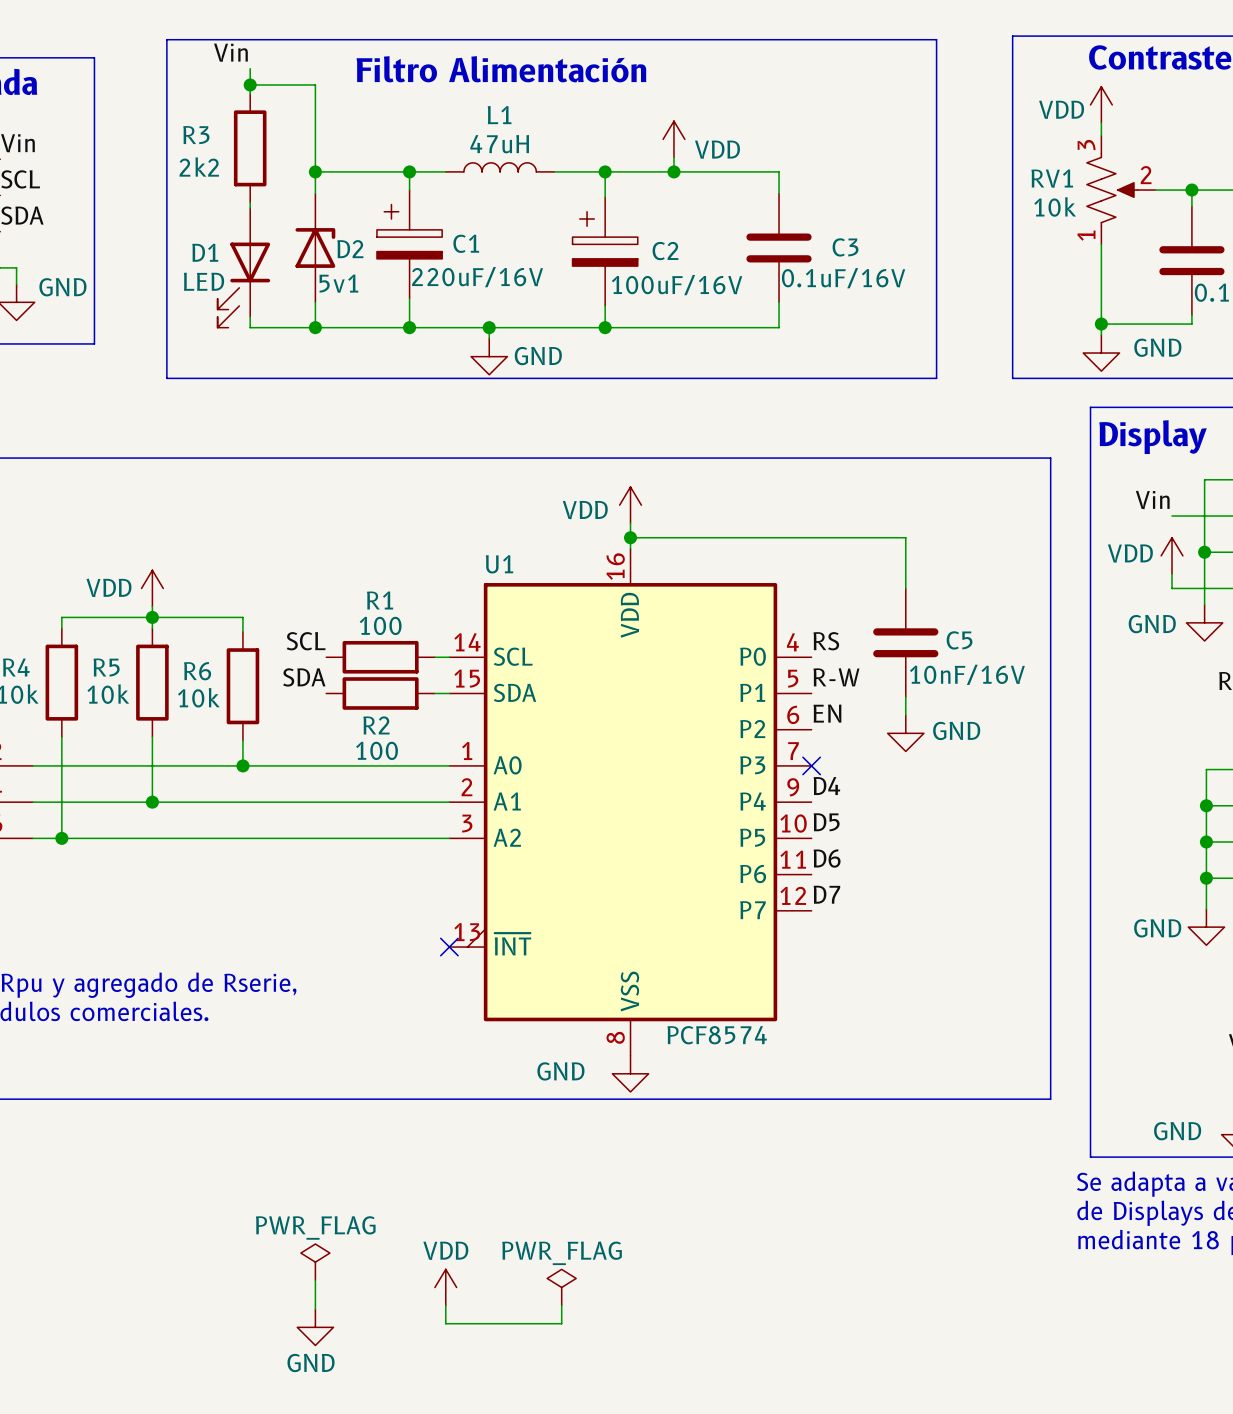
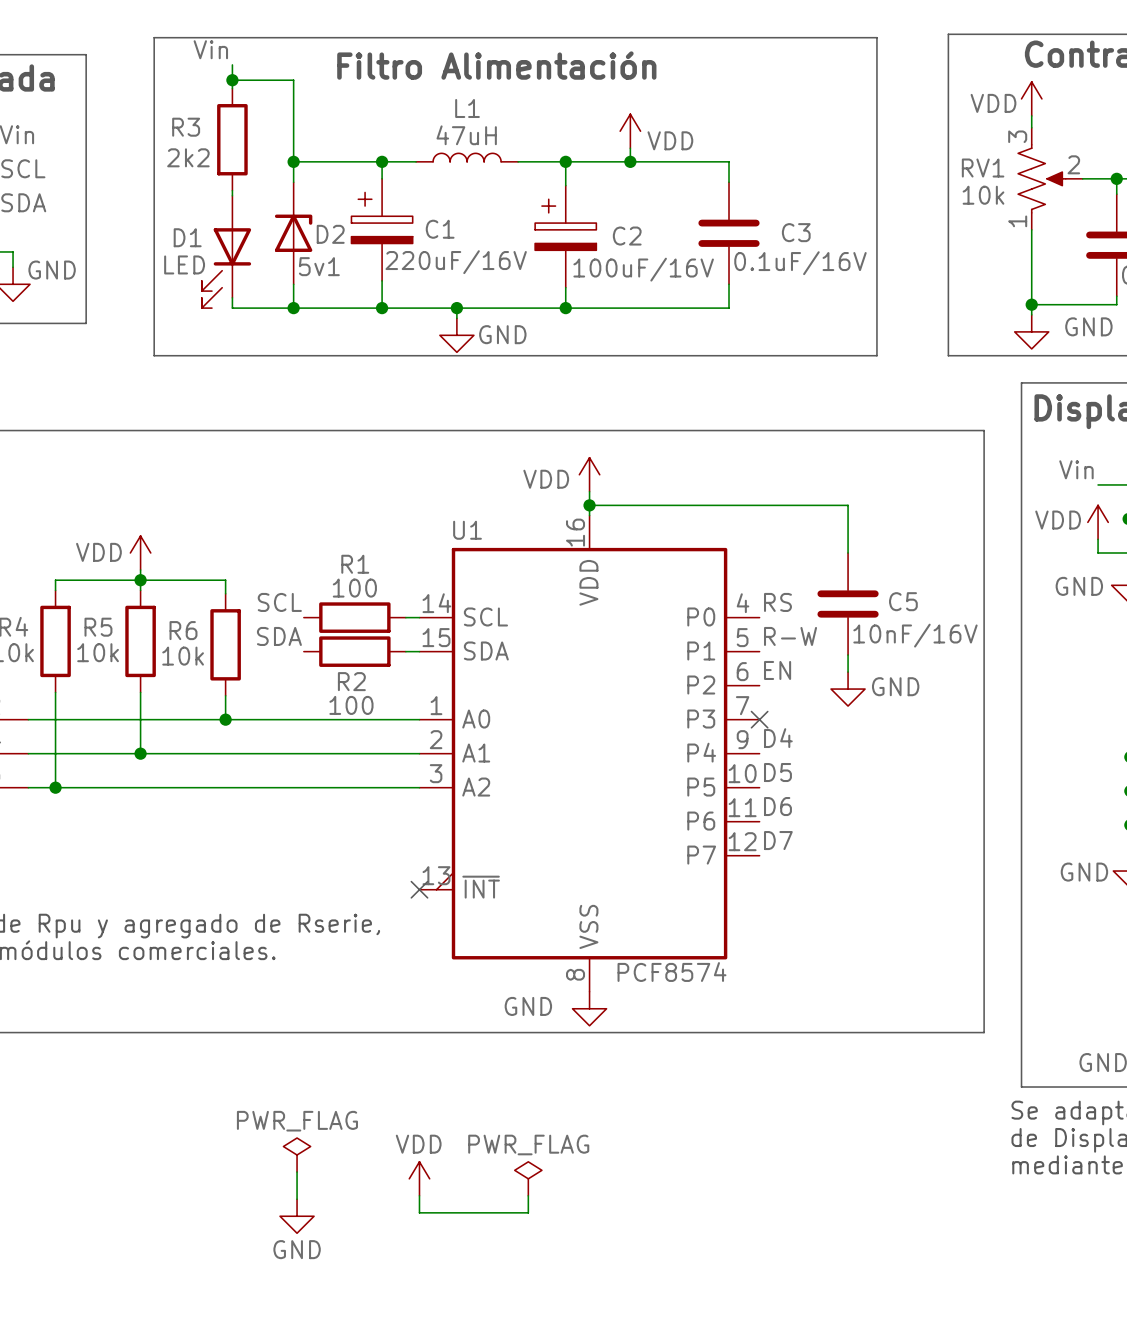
power symbol position: PWR_FLAG (315, 1262) -> PWR_FLAG (297, 1155)
wire: (315, 1280) (315, 1309) -> (297, 1172) (297, 1199)
power symbol position: VDD (445, 1287) -> VDD (419, 1178)
power symbol position: PWR_FLAG (561, 1287) -> PWR_FLAG (528, 1178)
wire: (445, 1305) (445, 1323) (561, 1323) (561, 1305) -> (419, 1195) (419, 1212) (528, 1212) (528, 1195)
power symbol position: GND (315, 1327) -> GND (297, 1216)

